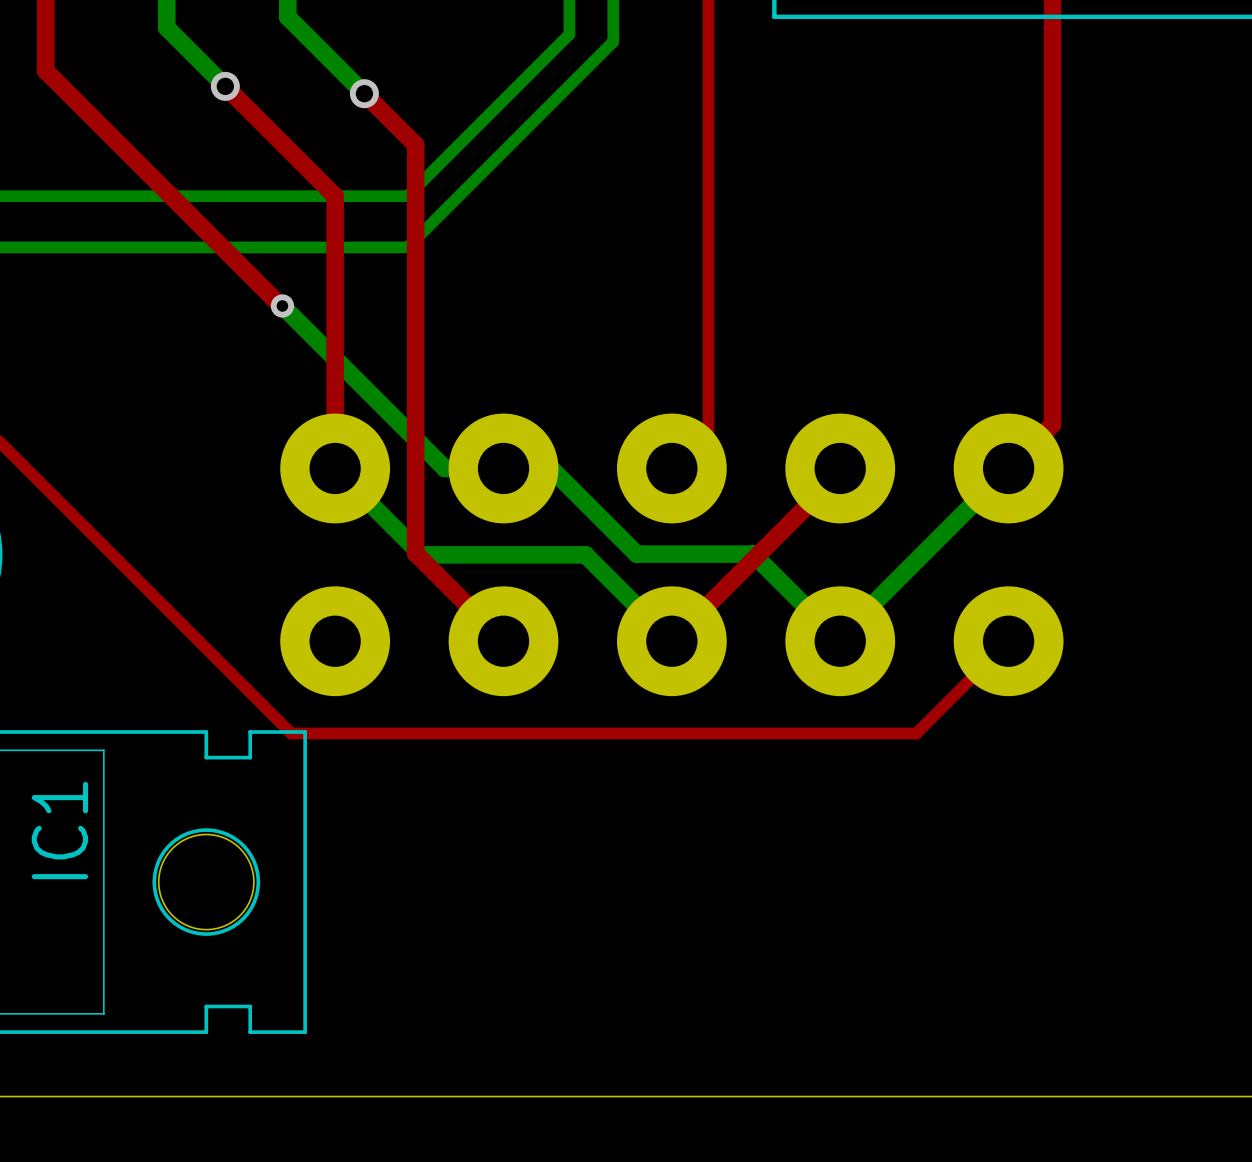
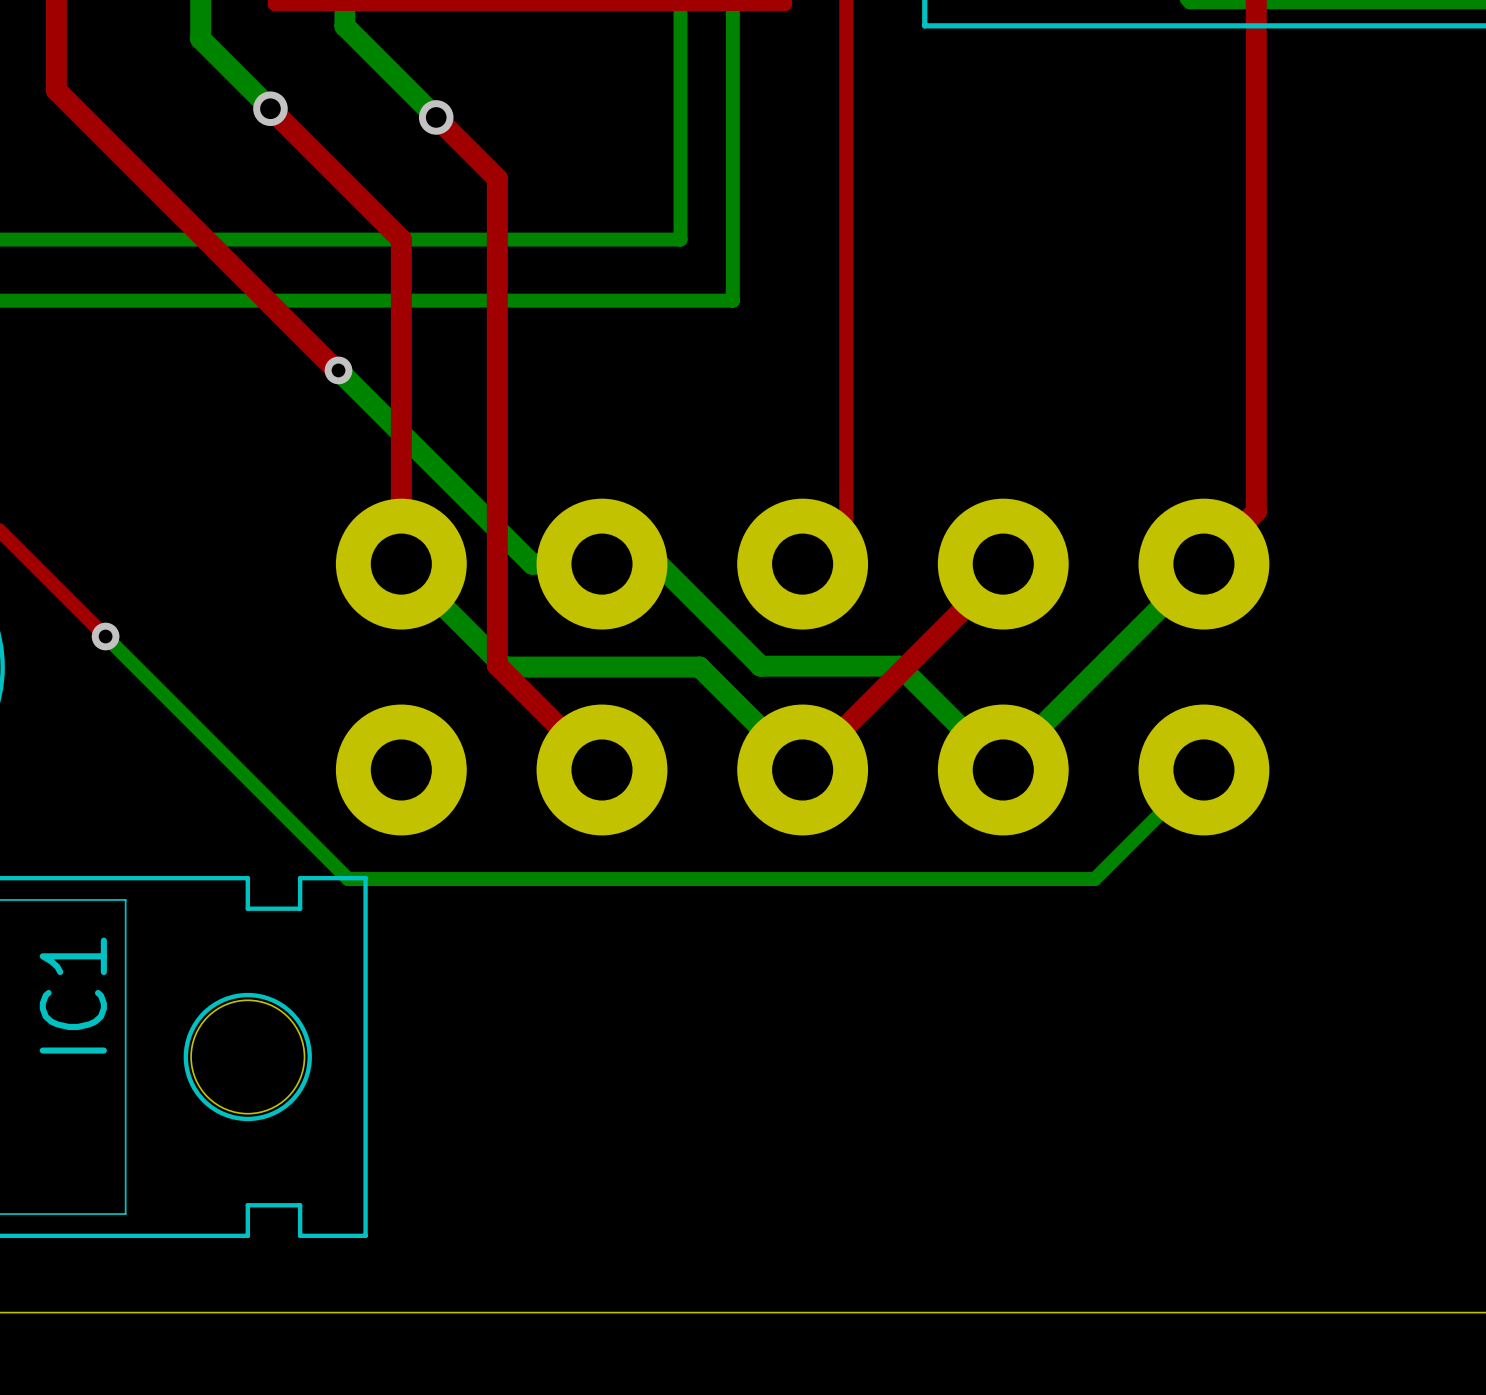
bottom track: (569, 34) (407, 196) -> (680, 46) (680, 239) (487, 239)
bottom track: (613, 41) (407, 247) -> (732, 55) (732, 300) (487, 300)
bottom track: none -> (105, 636) (348, 879) (1094, 879) (1203, 769)
top track: (87, 529) (291, 733) (916, 733) (1008, 641) -> none
via: none -> (105, 636)

